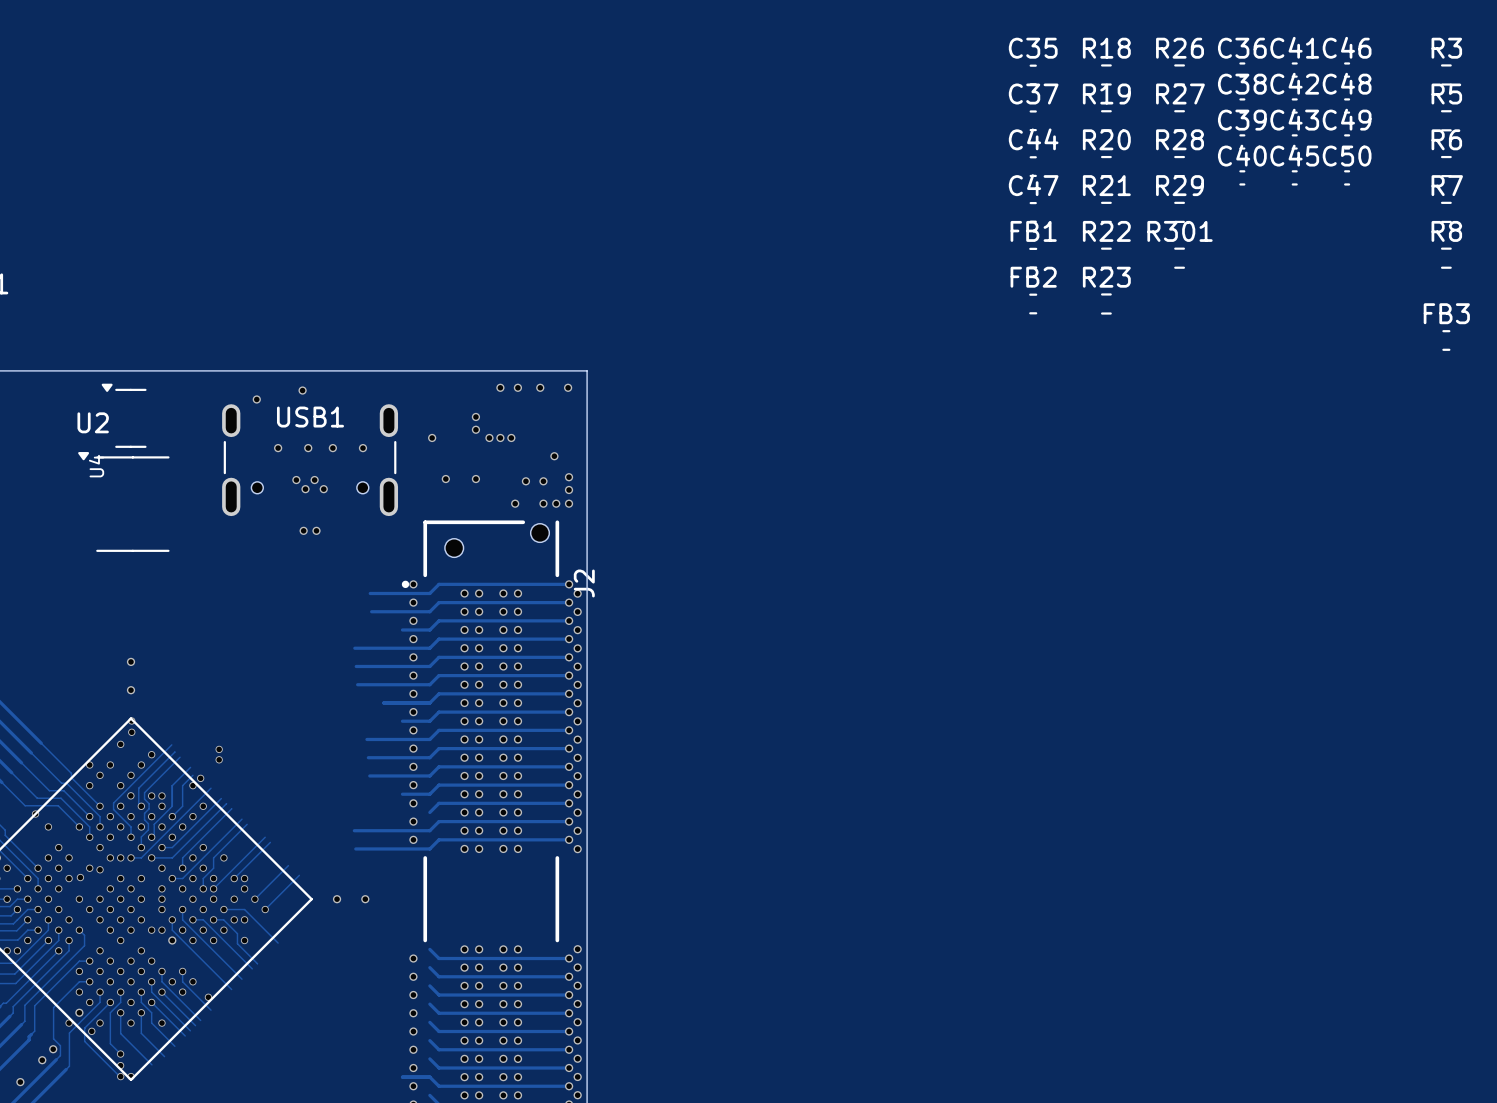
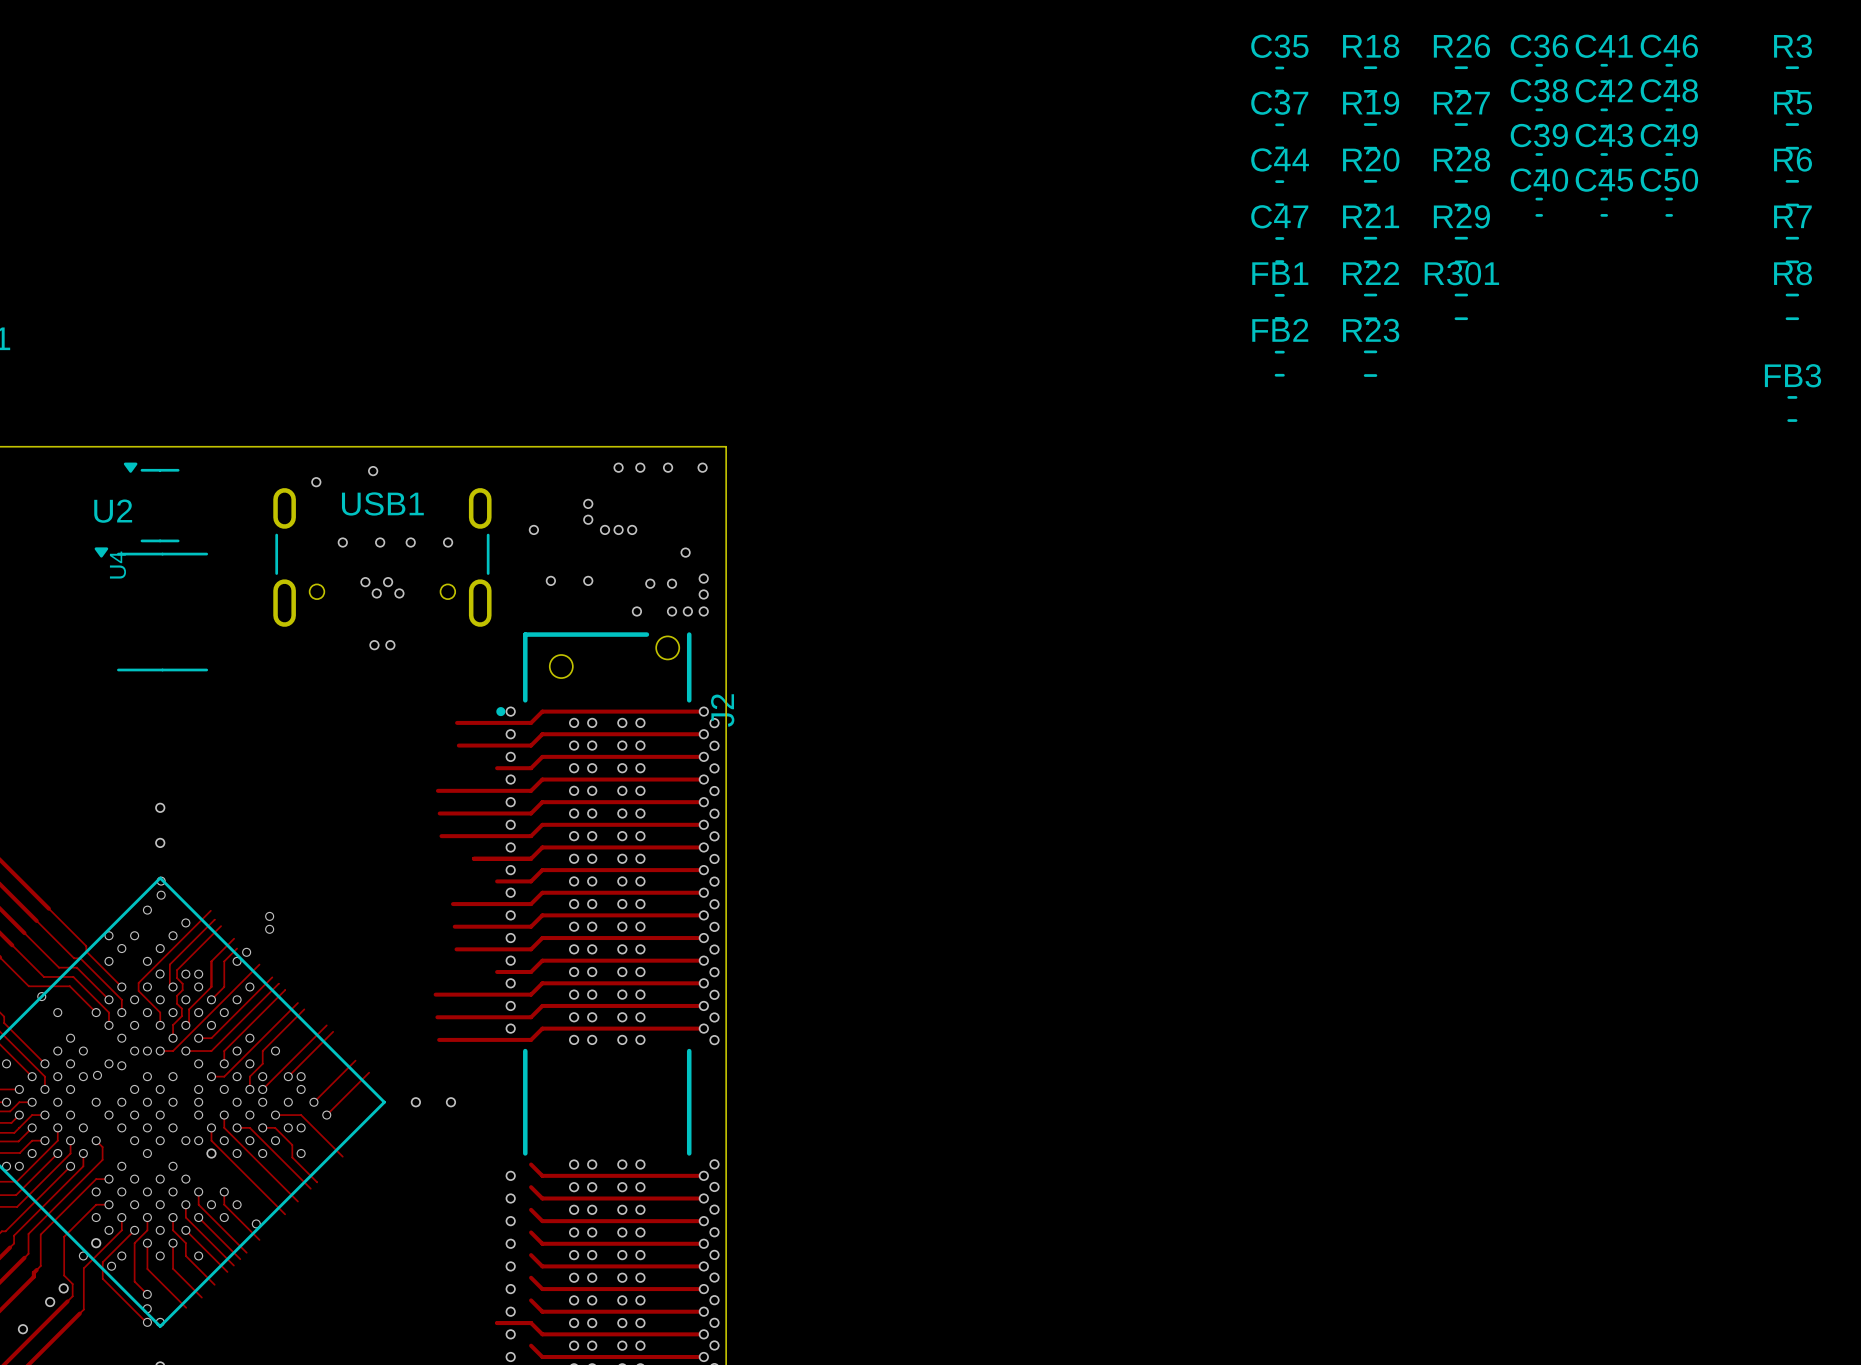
track: none -> (435, 994) (531, 994)

